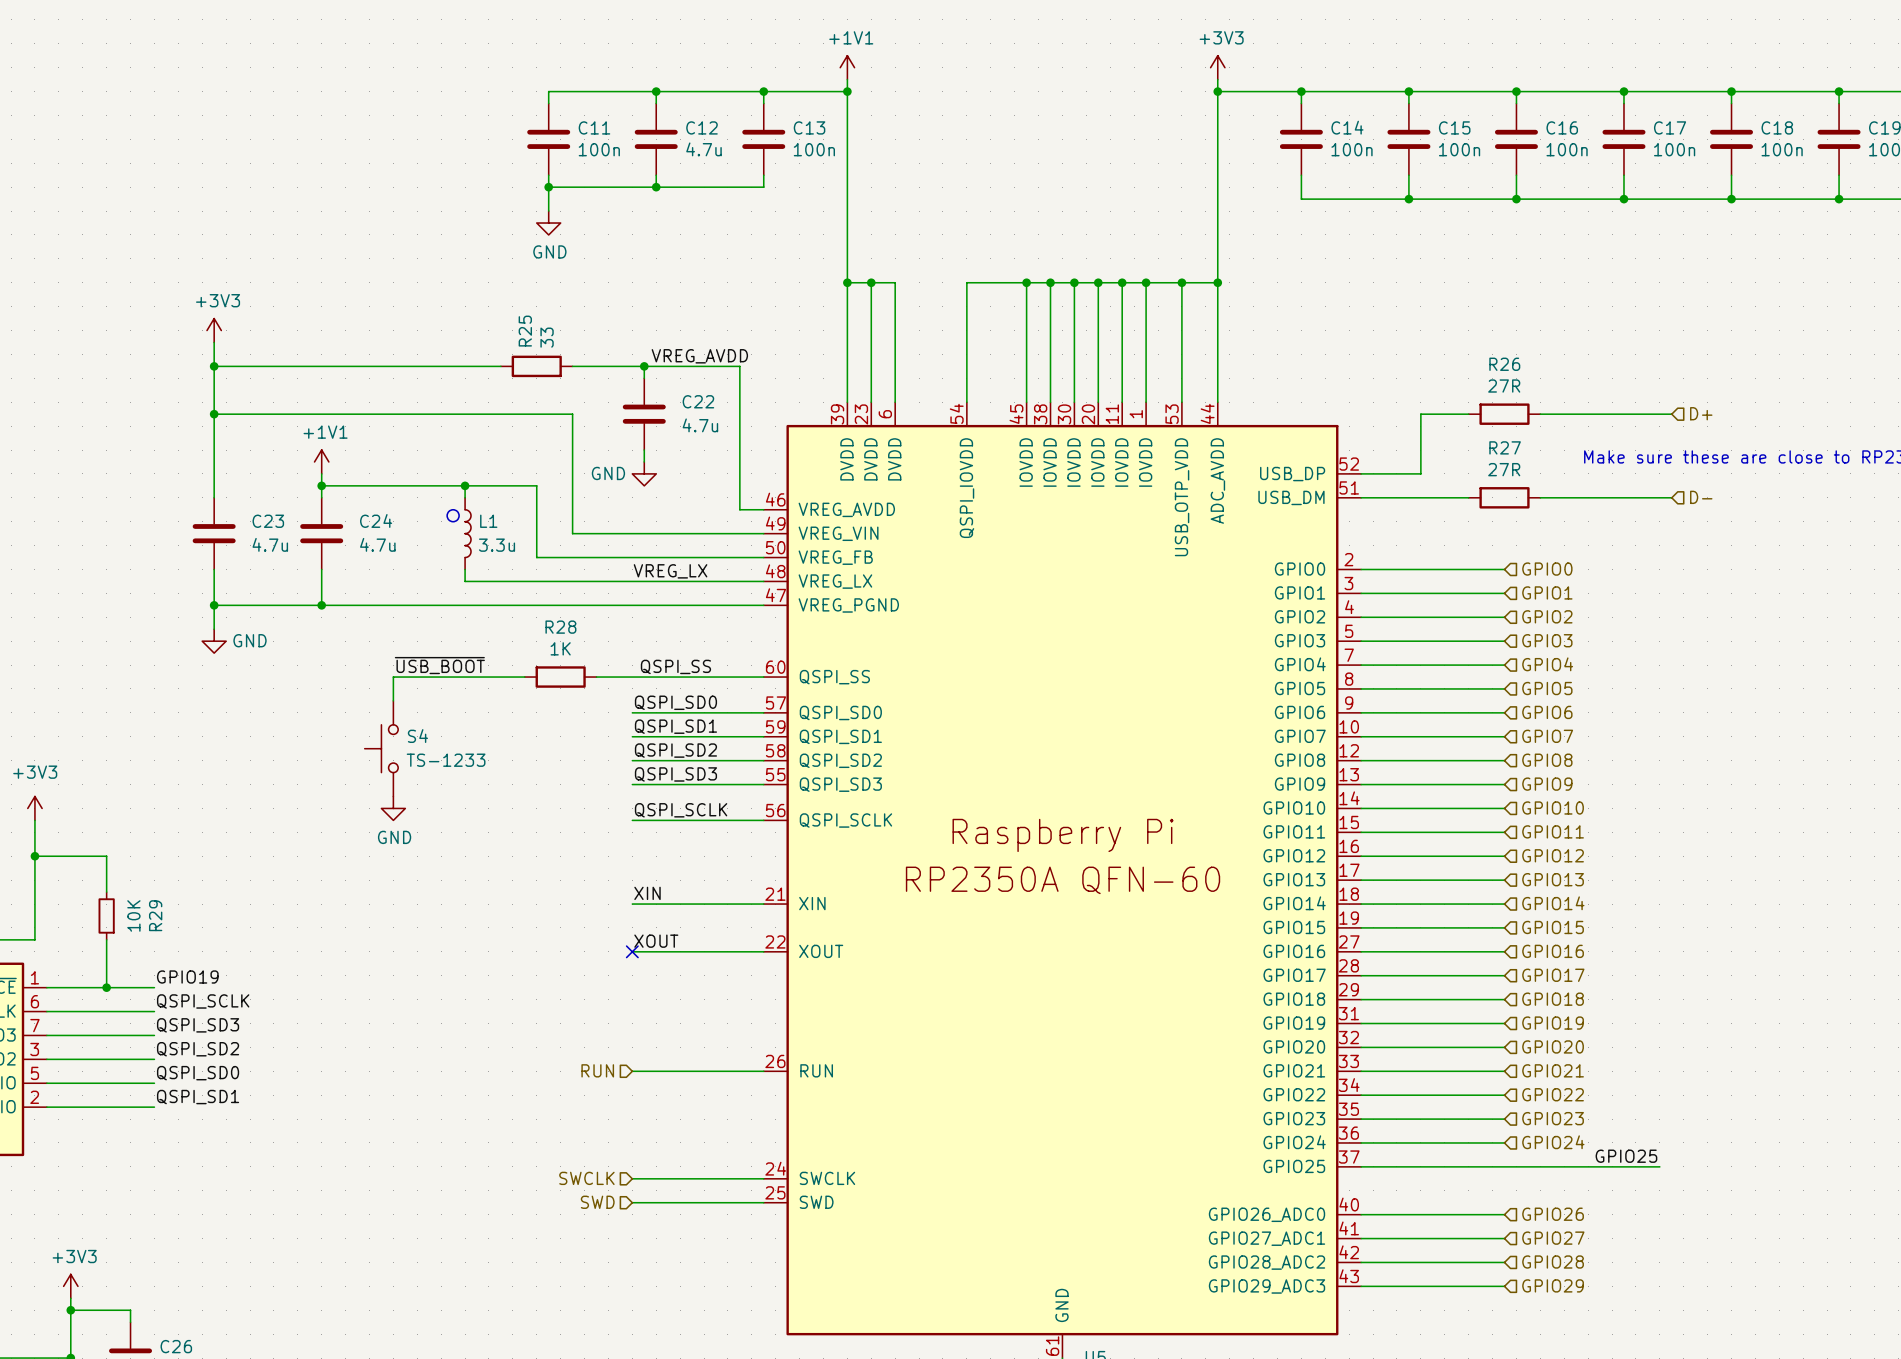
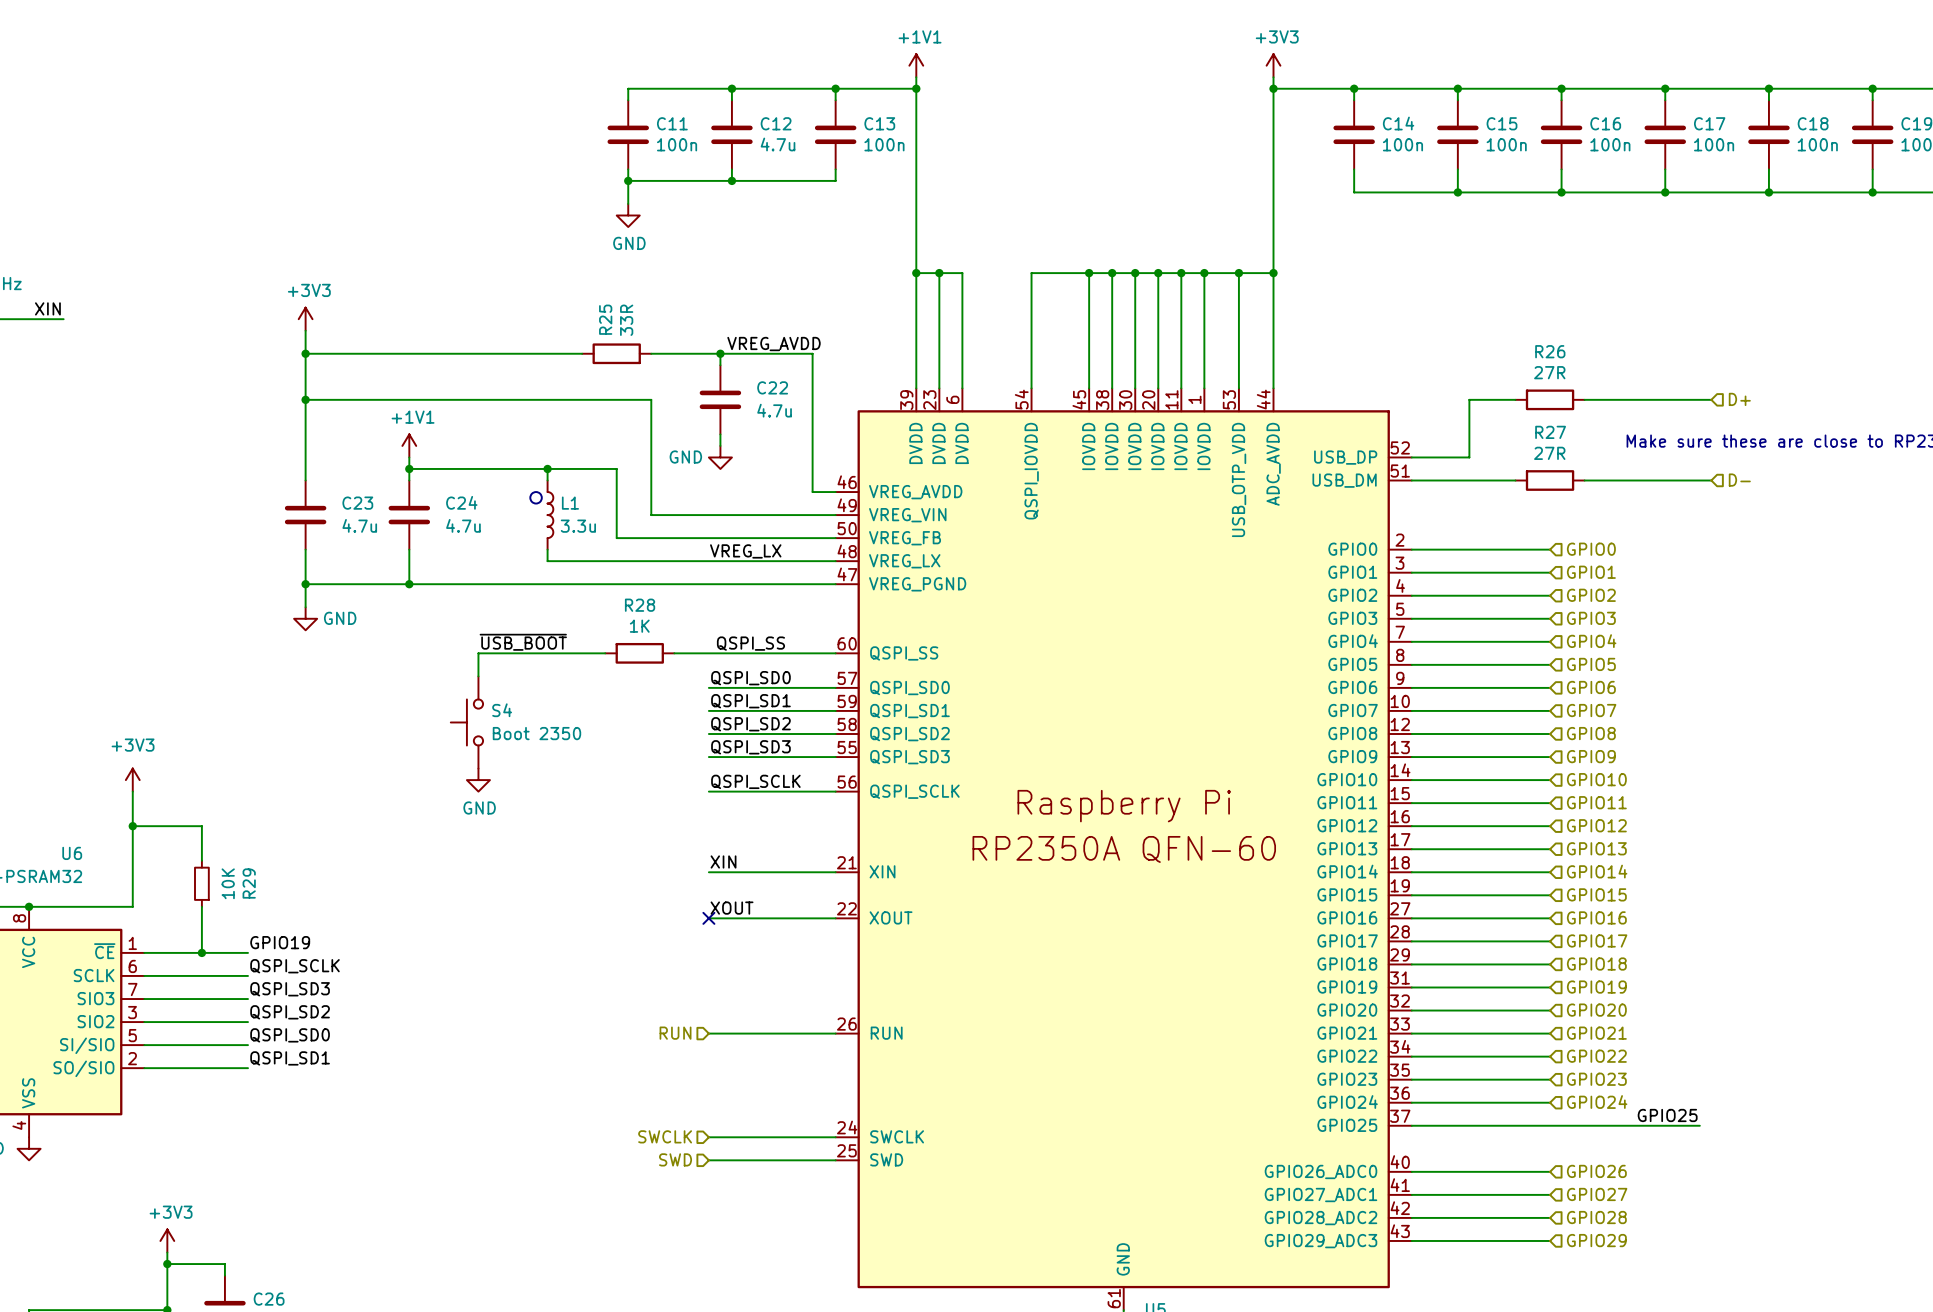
R25 value: 33 (547, 337) -> 33R (626, 320)
S4 value: TS-1233 (446, 760) -> Boot 2350 (536, 733)

